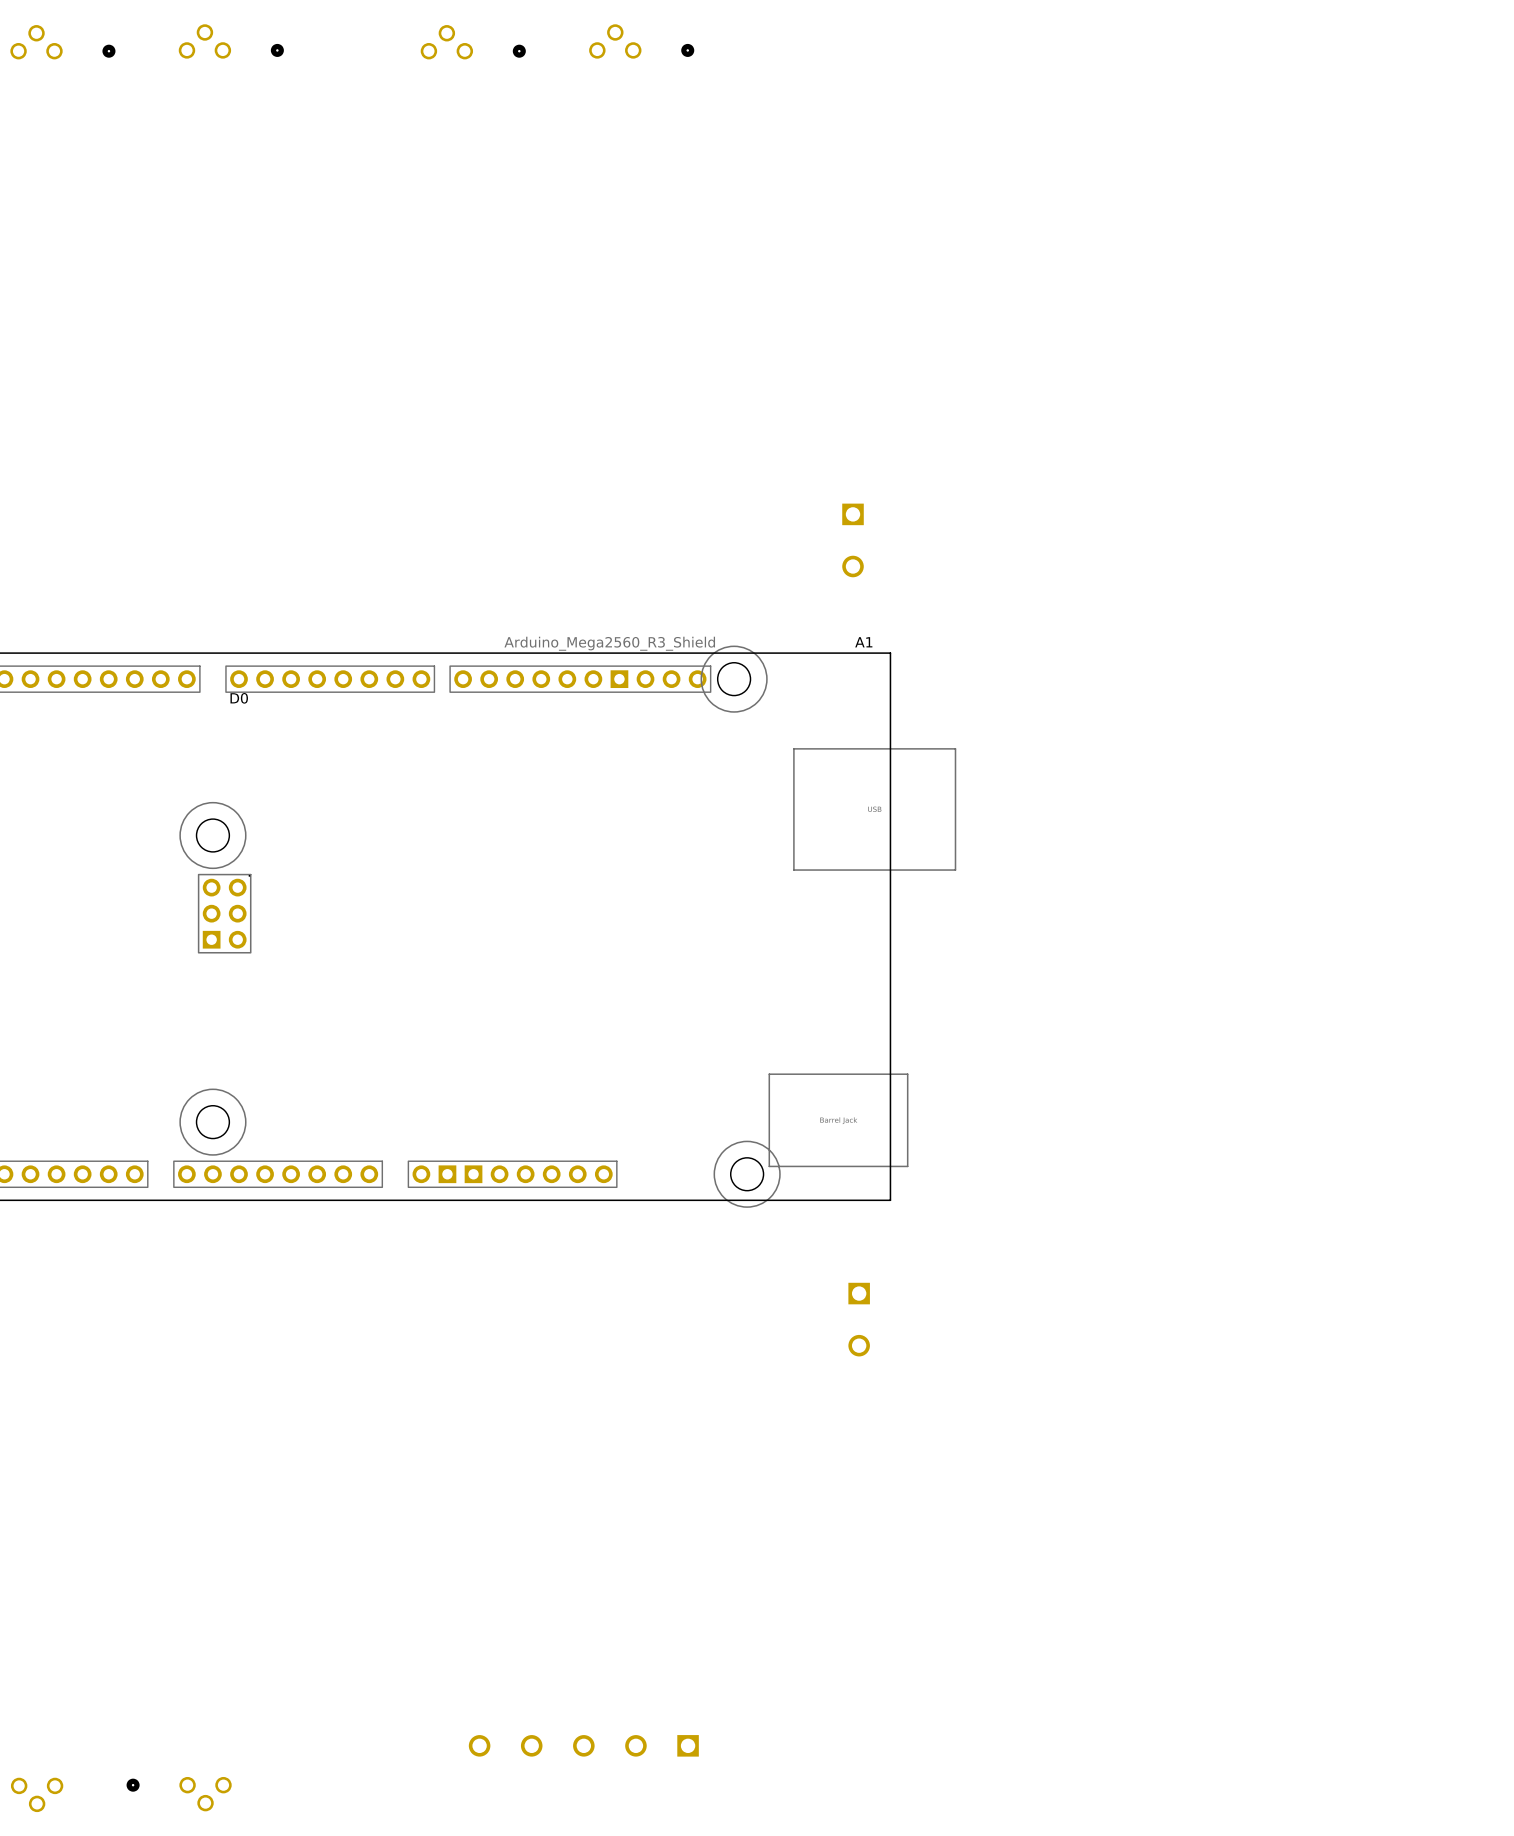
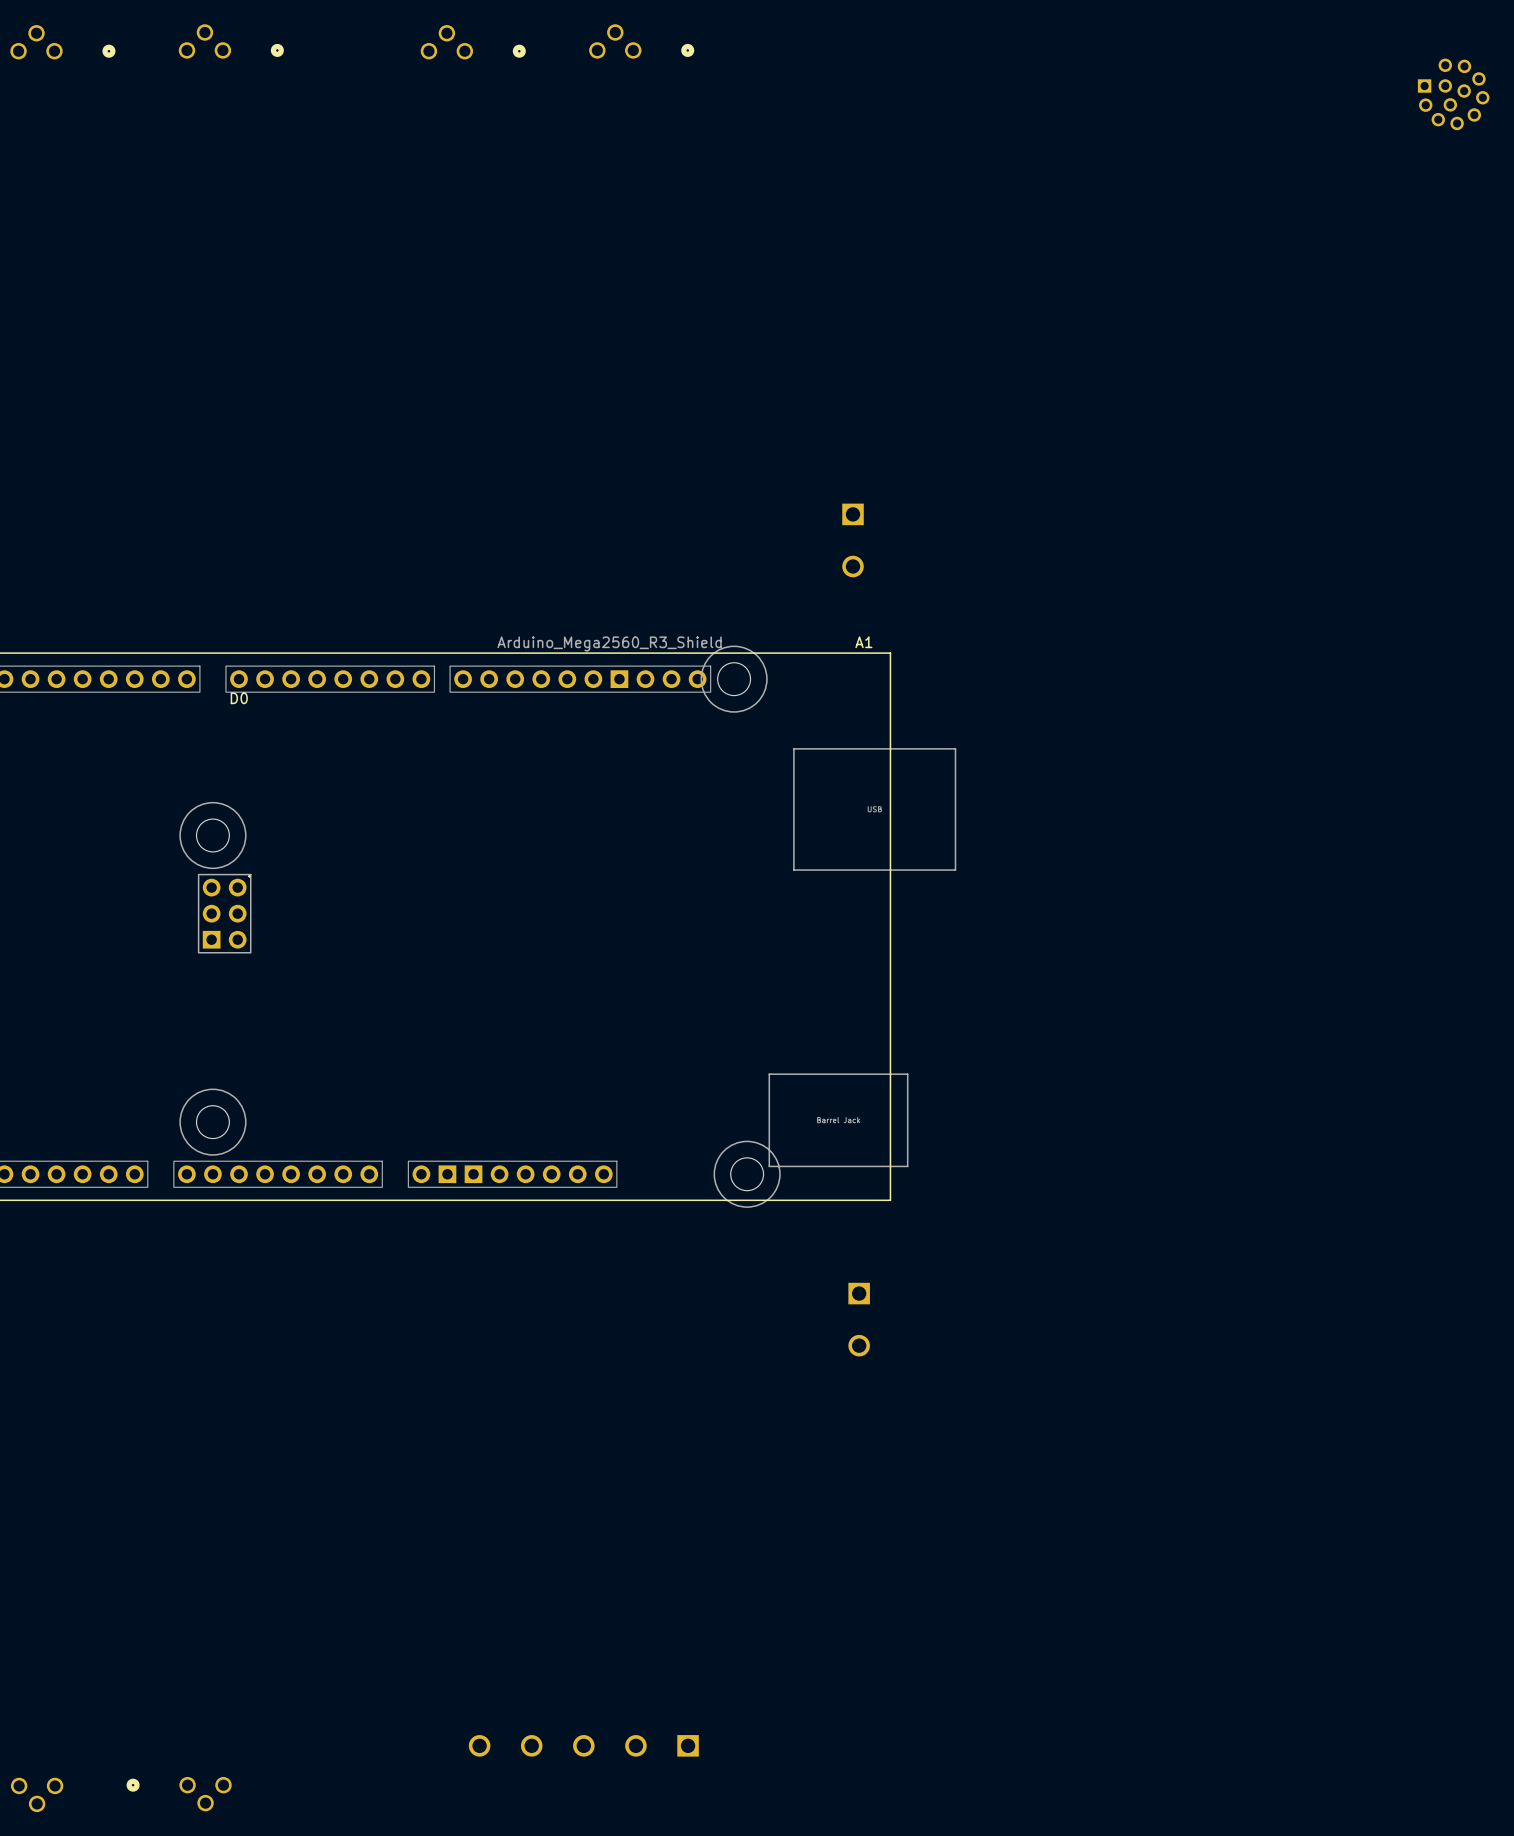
part: none -> (1453, 94)

